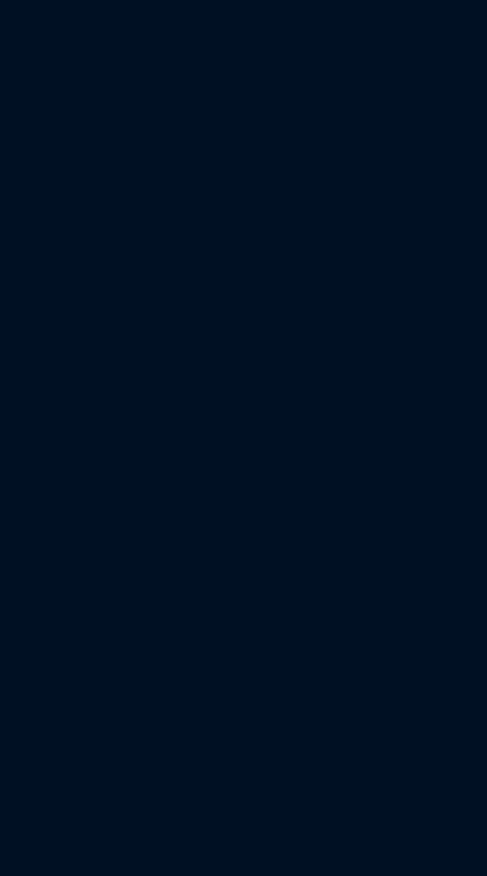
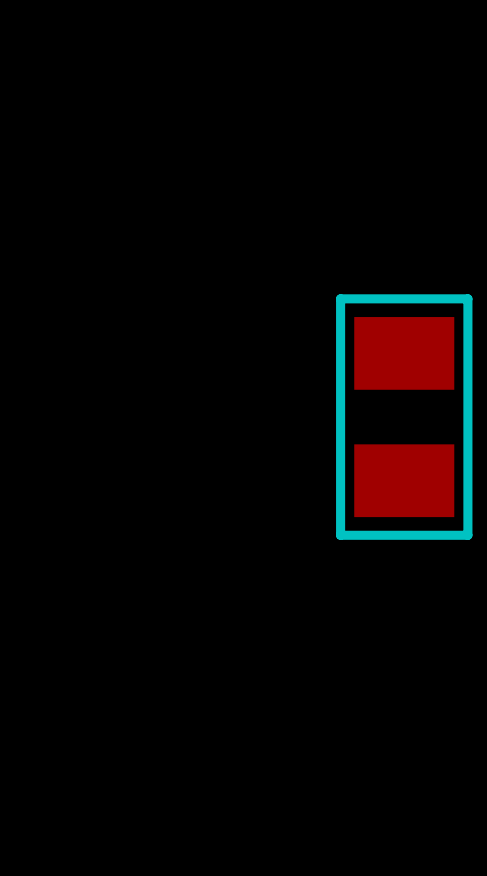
part: none -> (404, 417)

